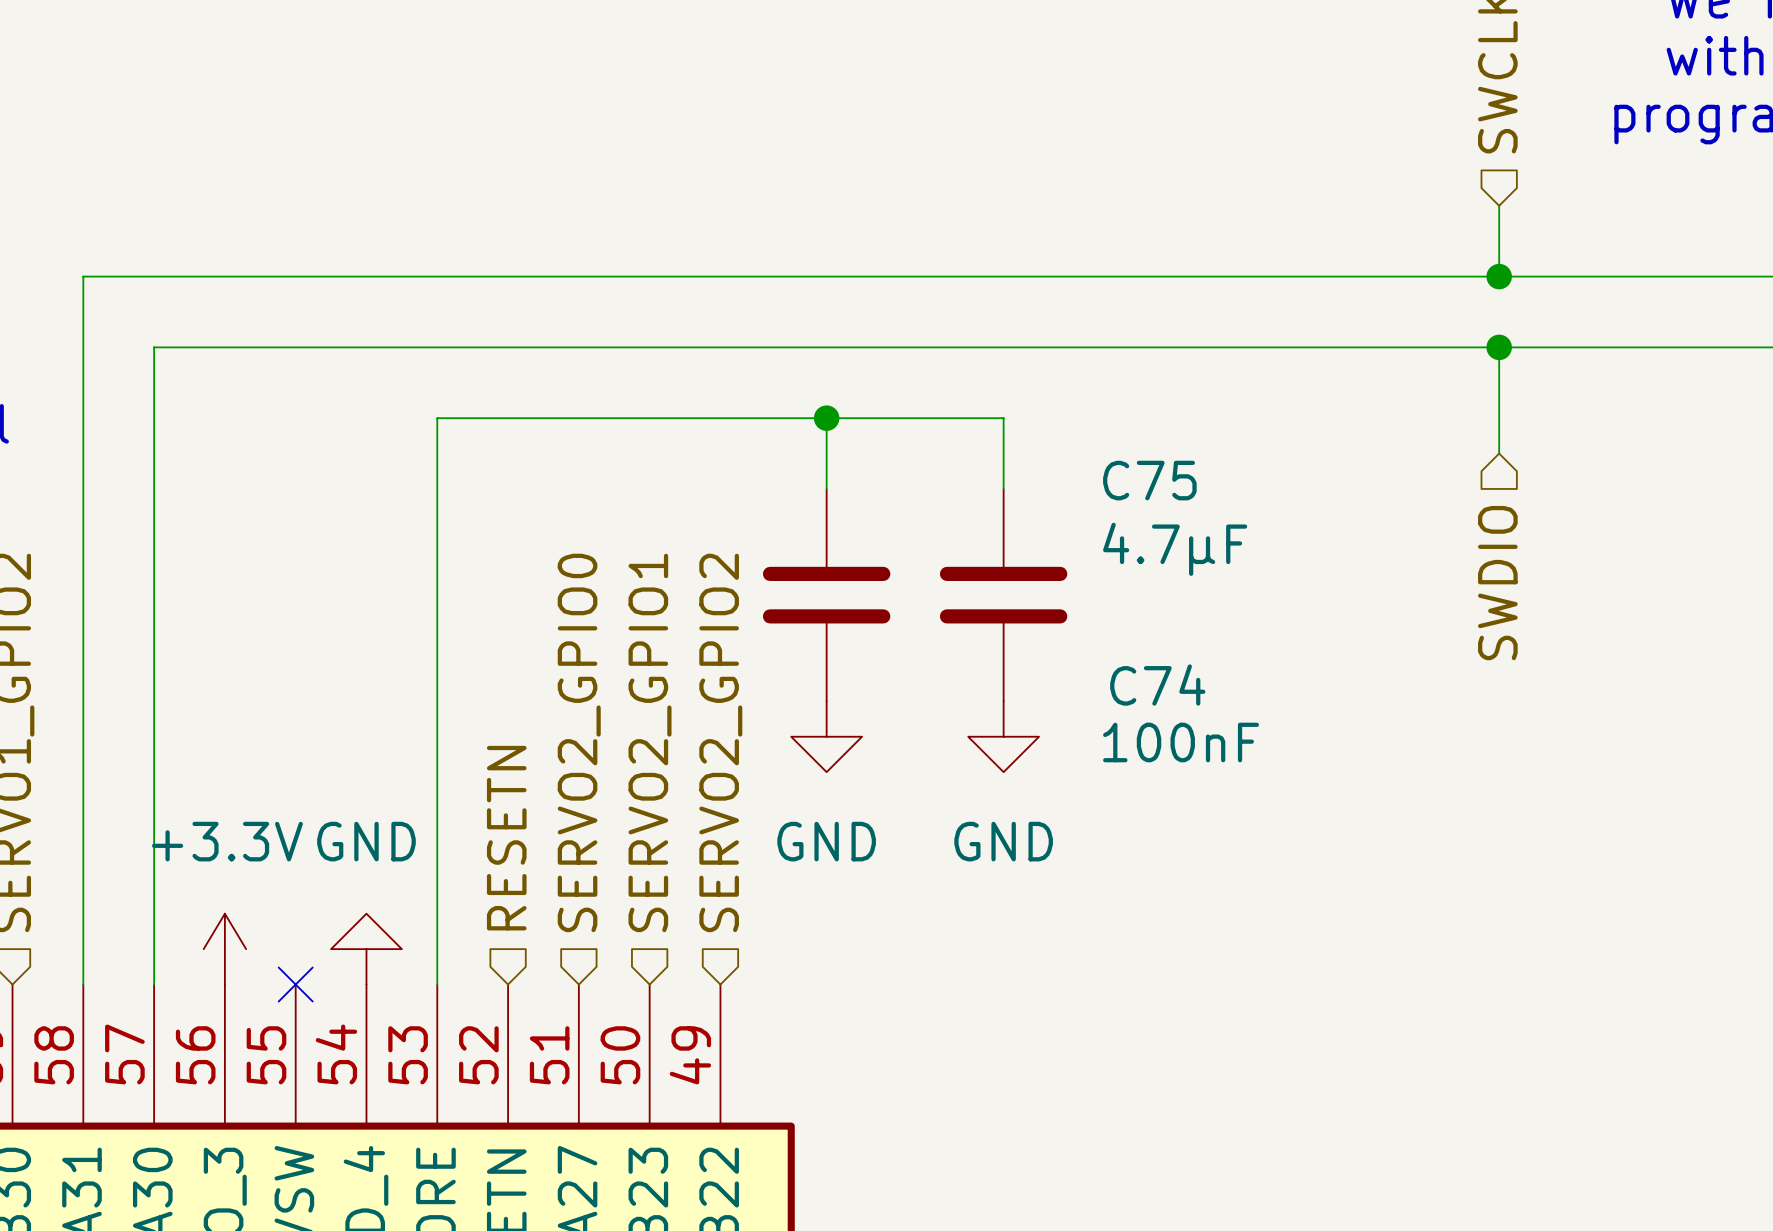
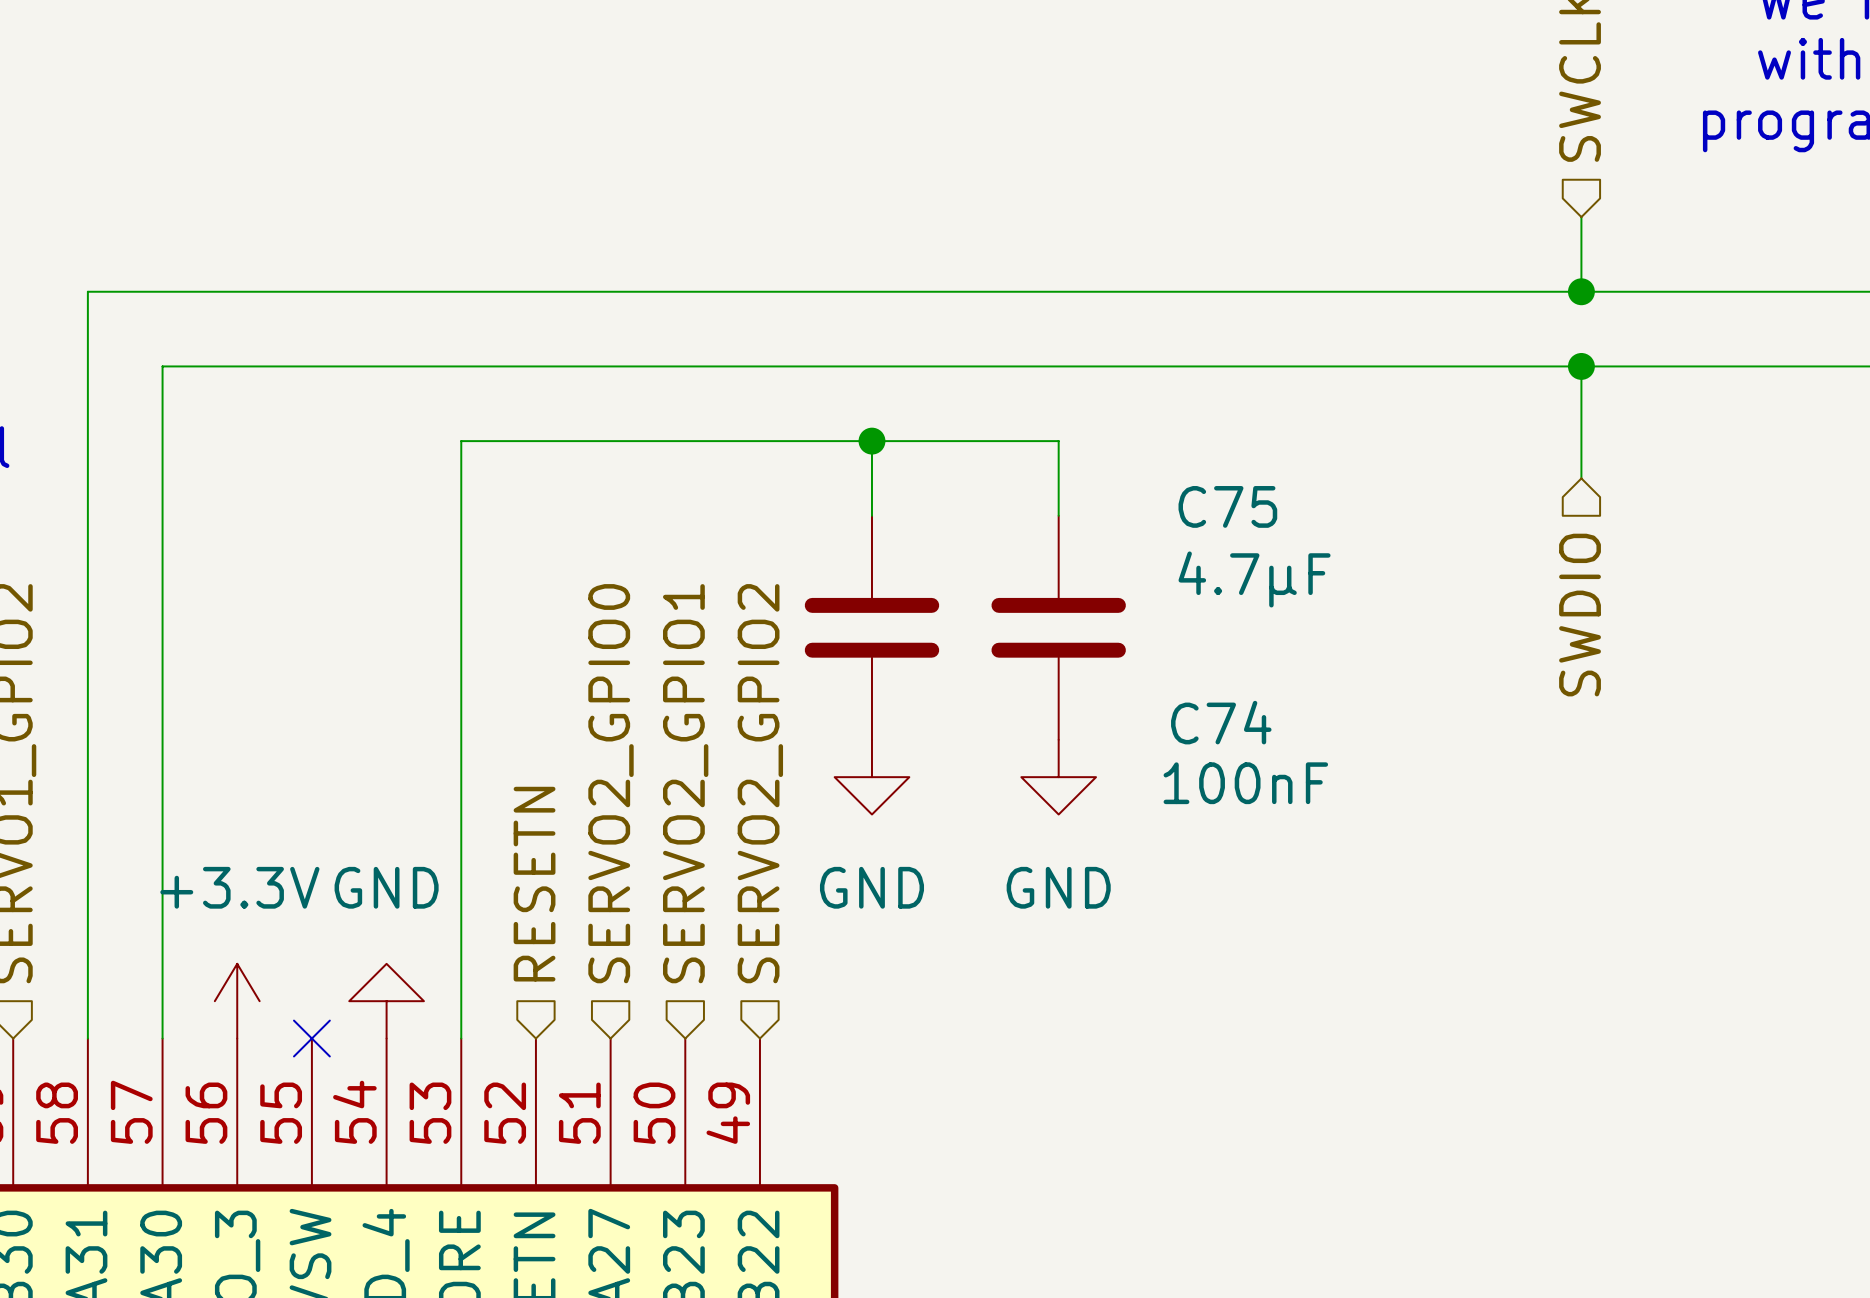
C75 name position: C75 (1149, 480) -> C75 (1227, 506)
C75 value position: 4.7µF (1175, 549) -> 4.7µF (1254, 579)

